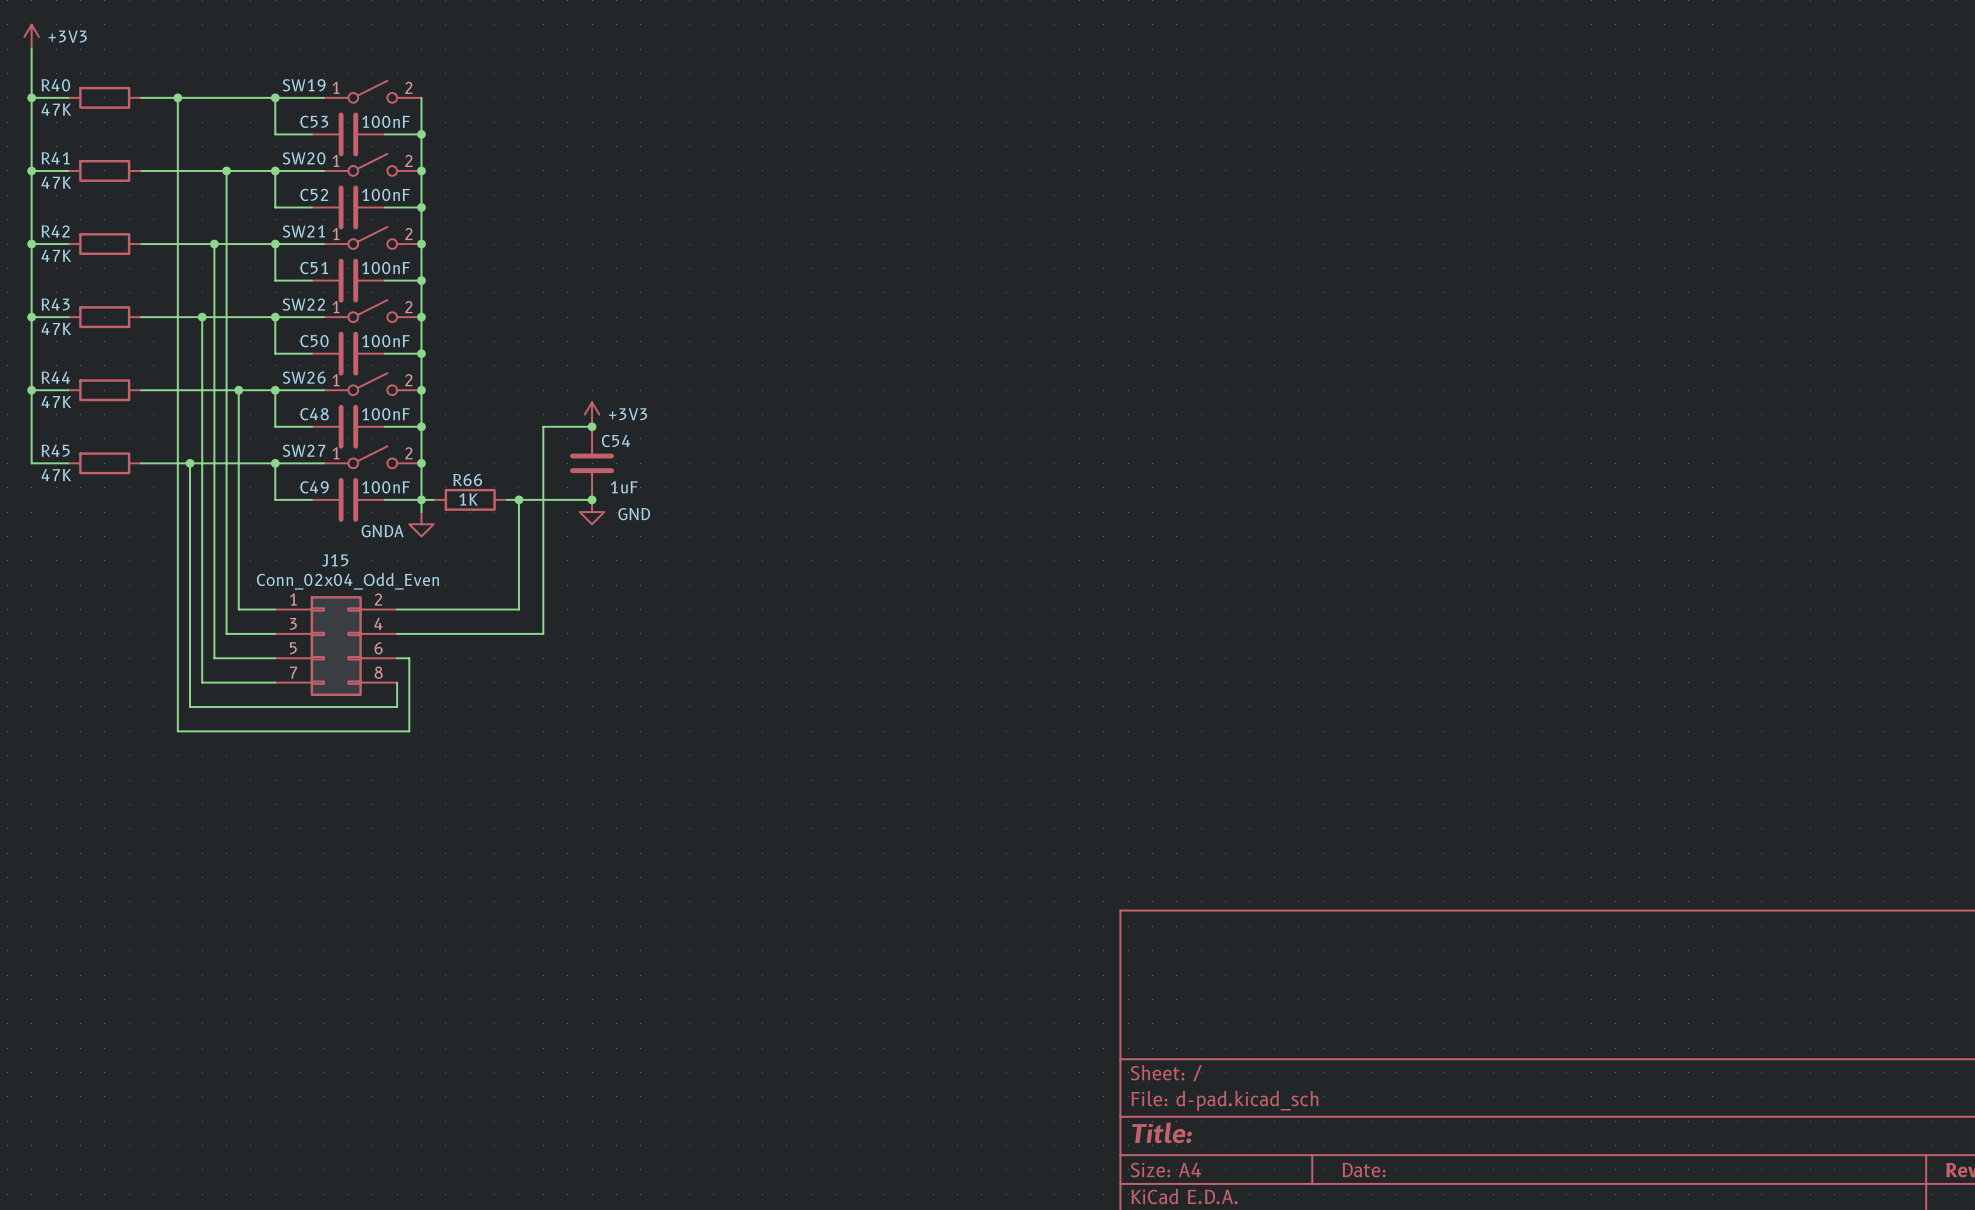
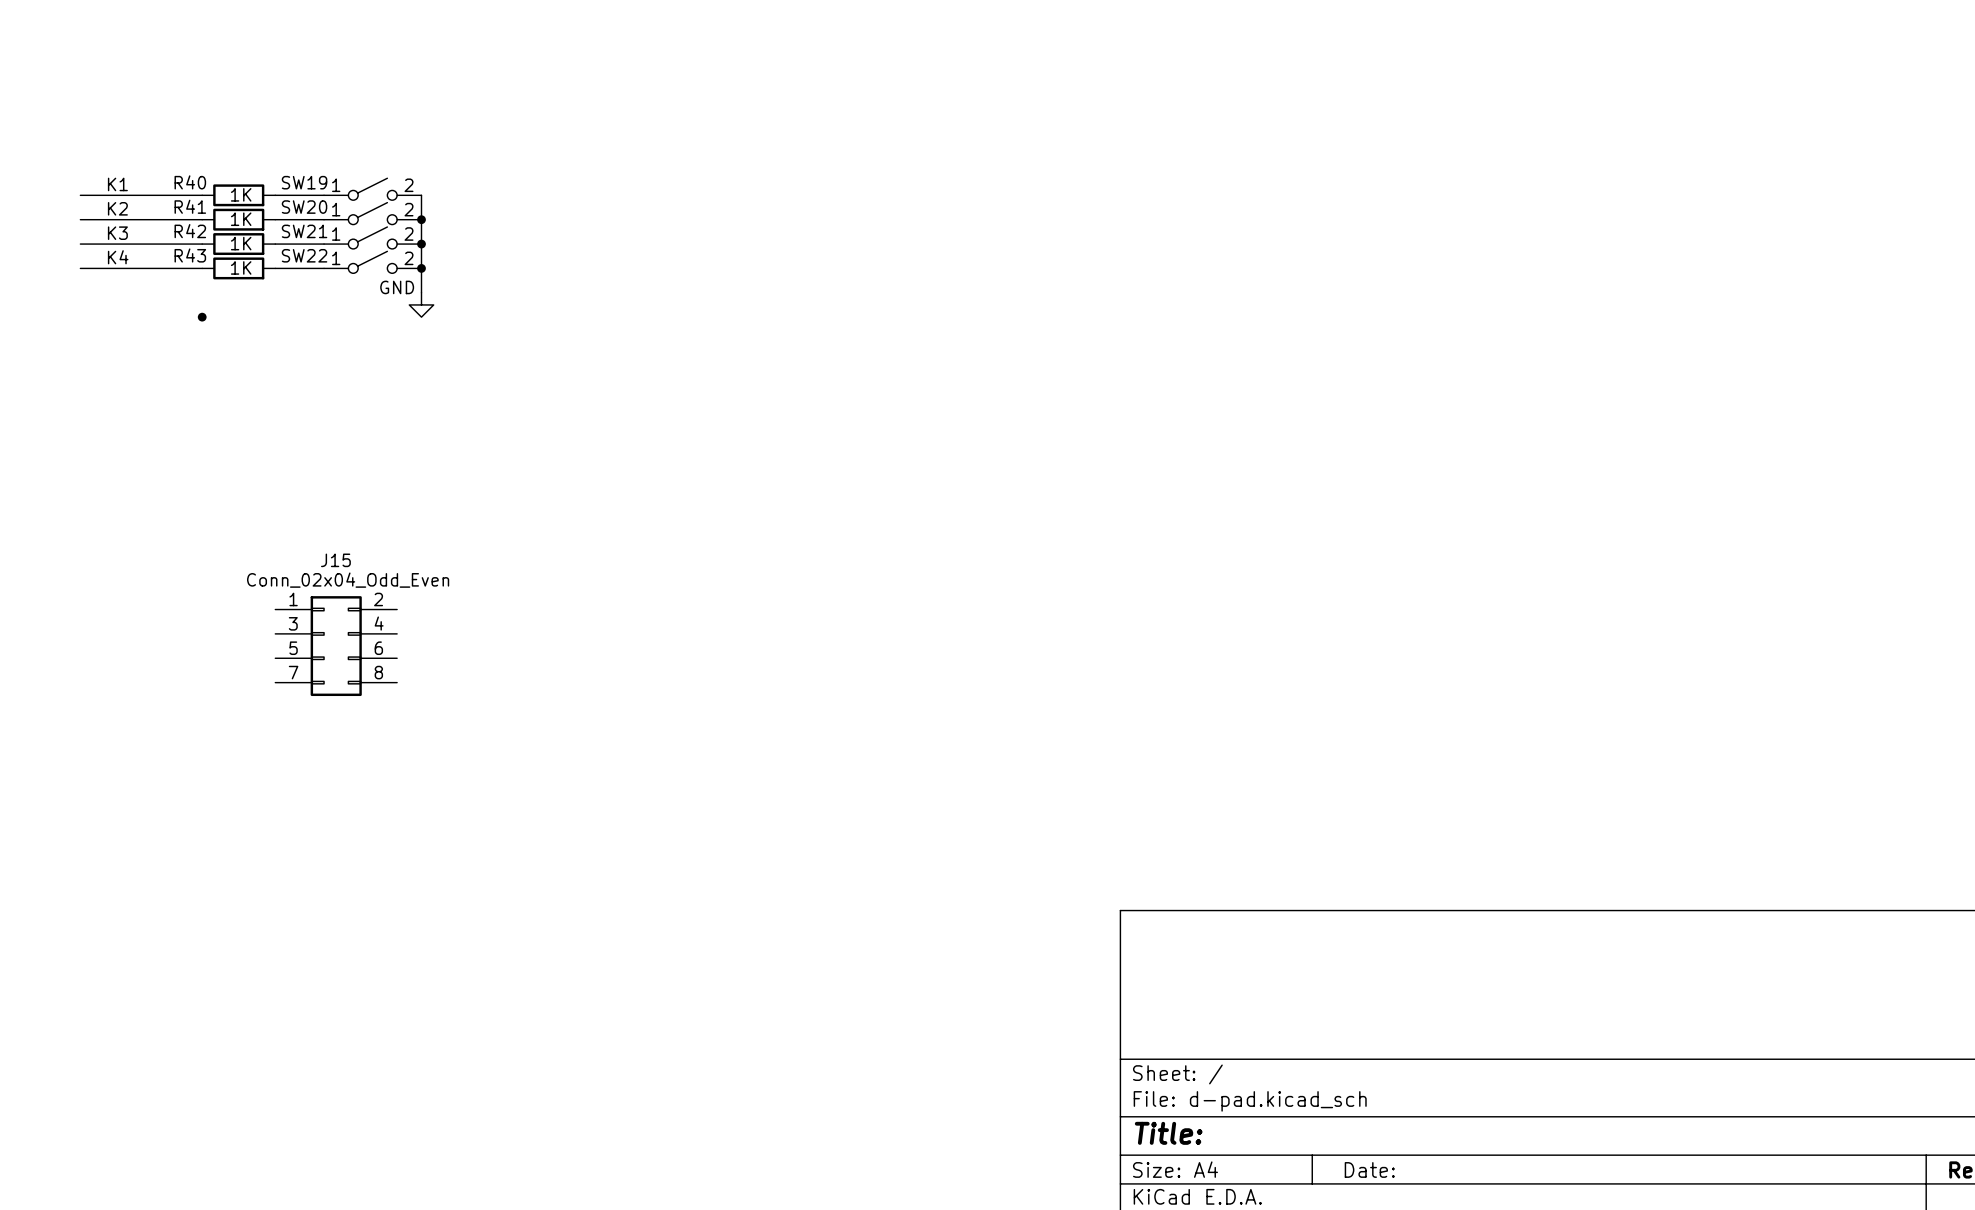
power symbol: +3V3 (31, 36) -> none
wire: (31, 49) (31, 463) (68, 463) -> none
SW19 position: (372, 91) -> (372, 189)
wire: (31, 97) (68, 97) -> none
junction: (31, 97) -> none
R40 position: (104, 97) -> (238, 195)
wire: (141, 97) (324, 97) -> none
wire: (177, 97) (177, 731) (409, 731) (409, 658) (397, 658) -> none
junction: (177, 97) -> none
wire: (275, 97) (275, 134) (311, 134) -> none
junction: (275, 97) -> none
wire: (421, 97) (421, 195) -> none
R40 value: 47K (56, 109) -> 1K (241, 194)
C53: 100nF (348, 134) -> none
wire: (384, 134) (421, 134) -> none
junction: (421, 134) -> none
SW20 position: (372, 164) -> (372, 213)
wire: (31, 170) (68, 170) -> none
junction: (31, 170) -> none
R41 position: (104, 170) -> (238, 219)
wire: (141, 170) (324, 170) -> none
wire: (226, 170) (226, 633) (275, 633) -> none
junction: (226, 170) -> none
wire: (275, 170) (275, 207) (311, 207) -> none
junction: (275, 170) -> none
junction: (421, 170) -> none
R41 value: 47K (56, 182) -> 1K (241, 219)
label: none -> K1 (117, 184)
wire: none -> (80, 195) (202, 195)
wire: none -> (275, 195) (324, 195)
C52: 100nF (348, 207) -> none
wire: (384, 207) (421, 207) -> none
junction position: (421, 207) -> (421, 219)
label: none -> K2 (117, 208)
wire: none -> (80, 219) (202, 219)
wire: none -> (275, 219) (324, 219)
label: none -> K3 (117, 233)
wire: (31, 244) (68, 244) -> none
junction: (31, 244) -> none
wire: none -> (80, 244) (141, 244)
R42 position: (104, 244) -> (238, 244)
wire: (202, 244) (275, 244) (275, 280) (311, 280) -> none
wire: (214, 244) (214, 658) (275, 658) -> none
junction: (214, 244) -> none
junction: (275, 244) -> none
R42 value: 47K (56, 255) -> 1K (241, 243)
label: none -> K4 (118, 257)
wire: none -> (80, 268) (202, 268)
wire: none -> (275, 268) (324, 268)
C51: 100nF (348, 280) -> none
wire: (384, 280) (421, 280) -> none
junction position: (421, 280) -> (421, 268)
wire: (421, 292) (421, 512) -> none
power symbol: none -> GND (421, 304)
SW22 position: (372, 311) -> (372, 262)
wire: (31, 317) (68, 317) -> none
junction: (31, 317) -> none
R43 position: (104, 317) -> (238, 268)
wire: (141, 317) (324, 317) -> none
wire: (202, 317) (202, 682) (275, 682) -> none
wire: (275, 317) (275, 353) (311, 353) -> none
junction: (275, 317) -> none
junction: (421, 317) -> none
R43 value: 47K (56, 328) -> 1K (241, 267)
C50: 100nF (348, 353) -> none
wire: (384, 353) (421, 353) -> none
junction: (421, 353) -> none
SW26: (372, 384) -> none
wire: (31, 390) (68, 390) -> none
junction: (31, 390) -> none
R44: 47K (104, 390) -> none
wire: (141, 390) (324, 390) -> none
wire: (238, 390) (238, 609) (275, 609) -> none
junction: (238, 390) -> none
wire: (275, 390) (275, 426) (311, 426) -> none
junction: (275, 390) -> none
junction: (421, 390) -> none
power symbol: +3V3 (592, 414) -> none
C48: 100nF (348, 426) -> none
wire: (384, 426) (421, 426) -> none
junction: (421, 426) -> none
wire: (592, 426) (543, 426) (543, 633) (397, 633) -> none
junction: (592, 426) -> none
SW27: (372, 457) -> none
R45: 47K (104, 463) -> none
wire: (141, 463) (324, 463) -> none
wire: (190, 463) (190, 706) (397, 706) (397, 682) -> none
junction: (190, 463) -> none
wire: (275, 463) (275, 499) (311, 499) -> none
junction: (275, 463) -> none
junction: (421, 463) -> none
C54: 1uF (592, 463) -> none
C49: 100nF (348, 499) -> none
wire: (384, 499) (433, 499) -> none
junction: (421, 499) -> none
R66: 1K (470, 499) -> none
wire: (506, 499) (592, 499) -> none
wire: (518, 499) (518, 609) (397, 609) -> none
junction: (518, 499) -> none
junction: (592, 499) -> none
power symbol: GND (592, 512) -> none
power symbol: GNDA (421, 524) -> none

